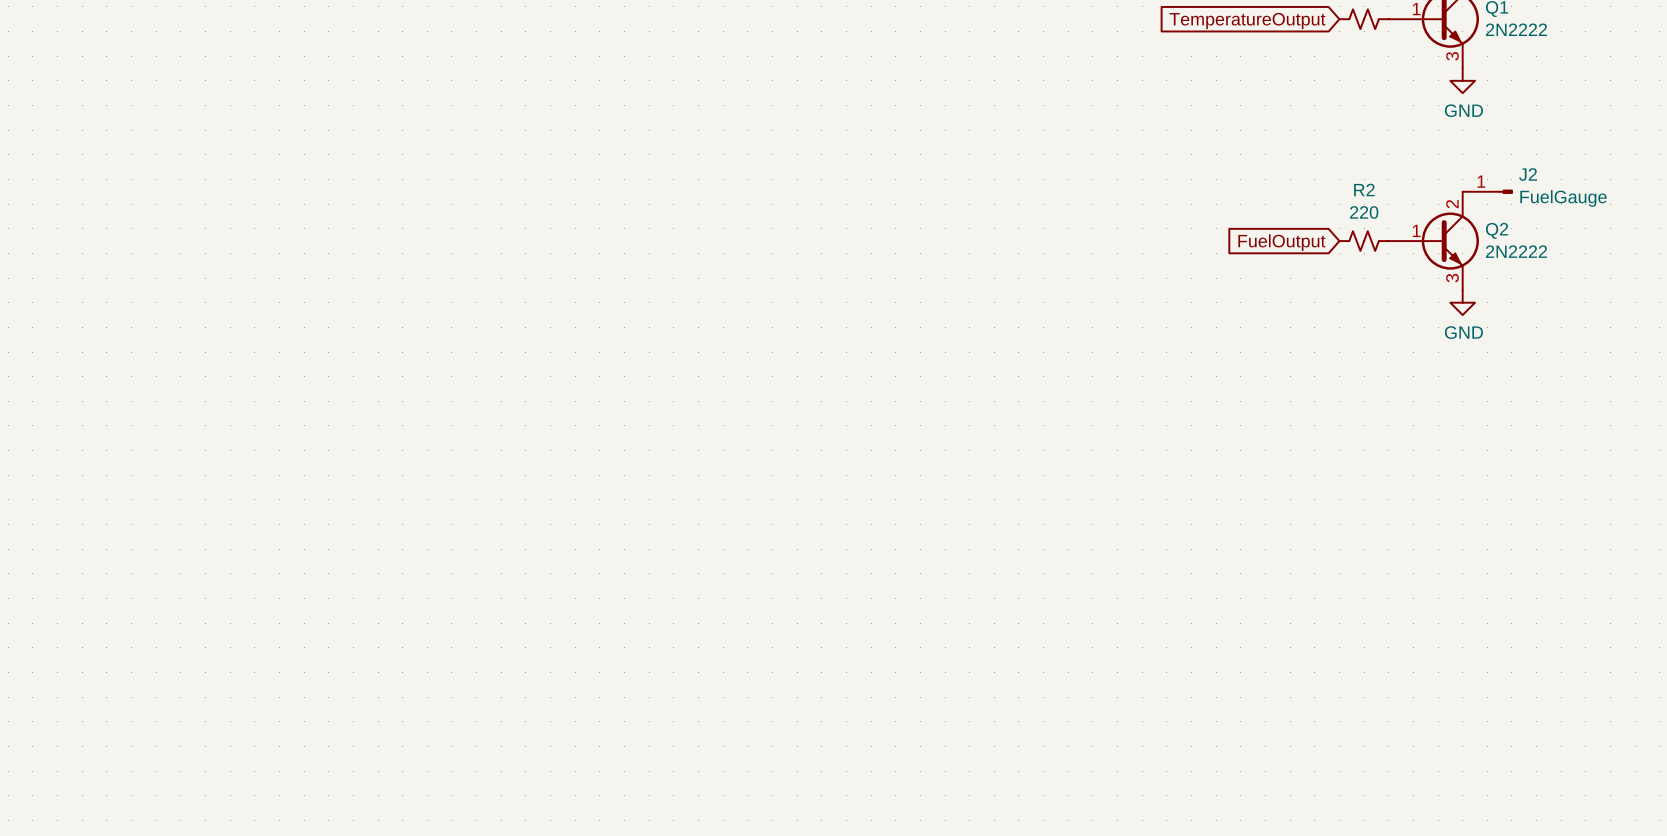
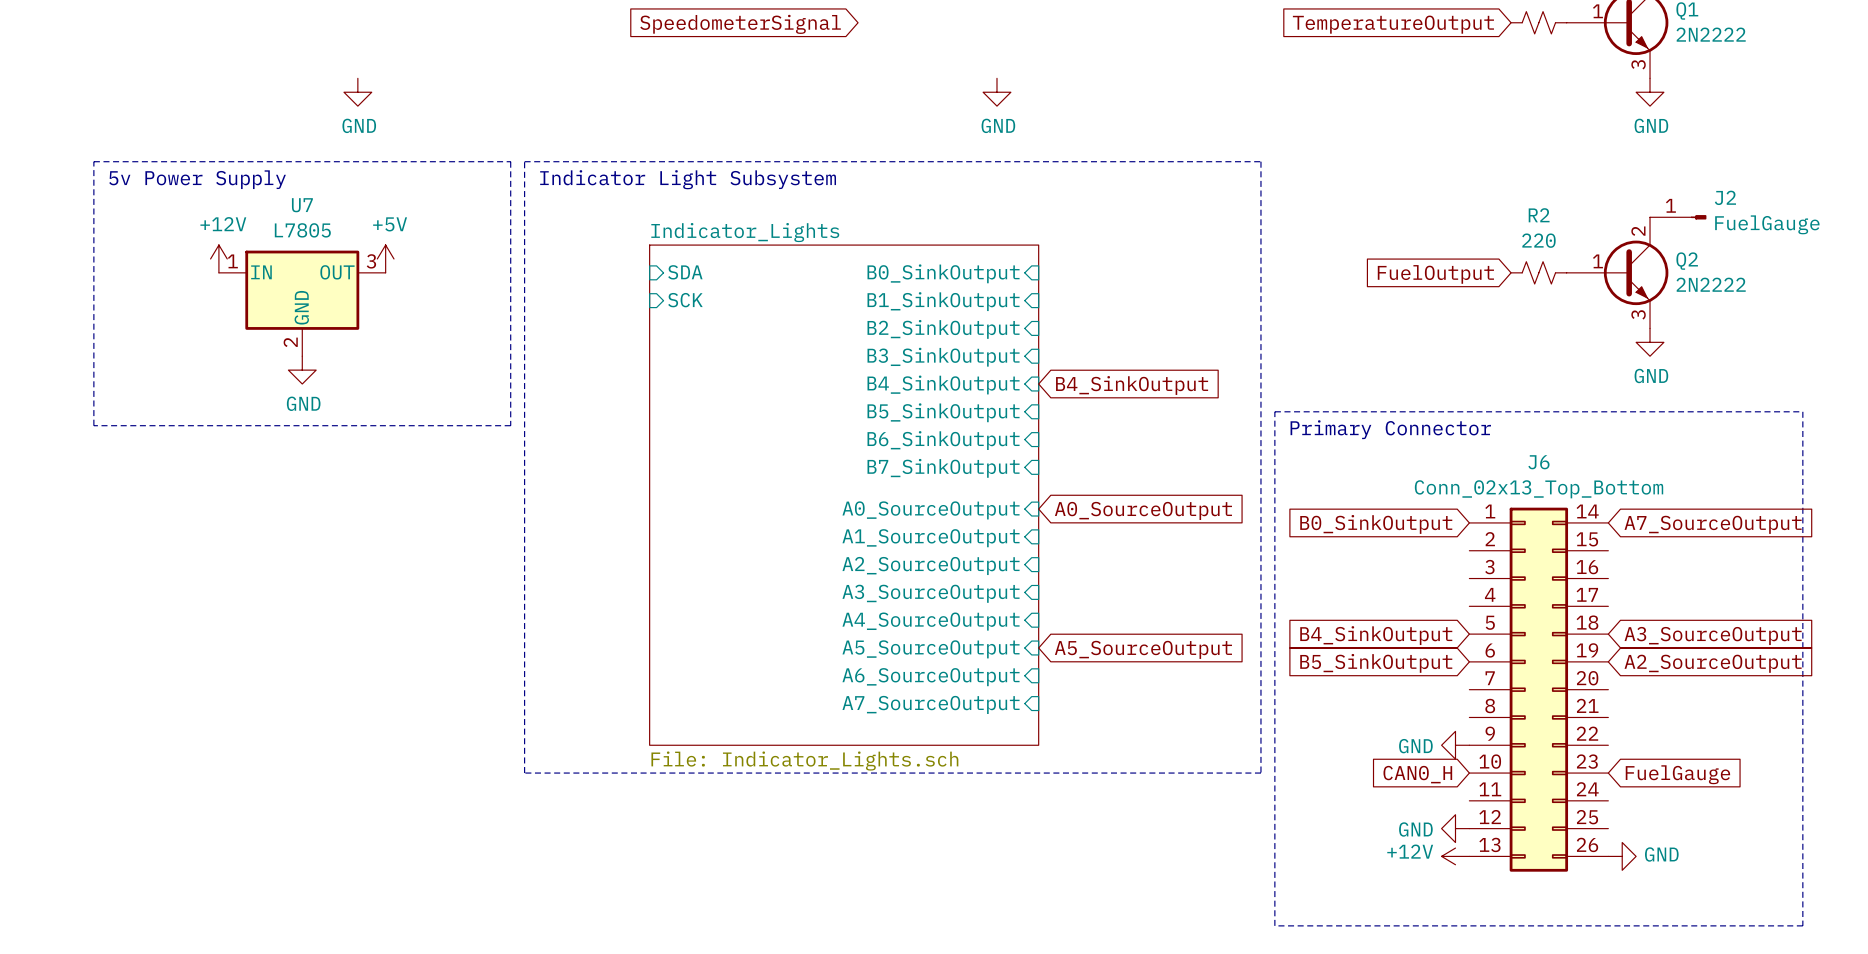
global label: none -> SpeedometerSignal (740, 24)
power symbol: none -> GND (357, 92)
power symbol: none -> GND (996, 92)
line: none -> (93, 161) (93, 425) (510, 425) (510, 161) (93, 161)
line: none -> (524, 161) (1260, 161) (1260, 773) (524, 773) (524, 161)
text: none -> 5v Power Supply (197, 179)
text: none -> Indicator Light Subsystem (688, 179)
power symbol: none -> +12V (218, 258)
power symbol: none -> +5V (385, 258)
sheet pin: none -> SDA (685, 272)
sheet pin: none -> B0_SinkOutput (943, 273)
sheet pin: none -> SCK (685, 300)
sheet pin: none -> B1_SinkOutput (943, 301)
U7: none -> L7805 (302, 303)
sheet pin: none -> B2_SinkOutput (943, 329)
sheet pin: none -> B3_SinkOutput (943, 357)
power symbol: none -> GND (302, 370)
sheet pin: none -> B4_SinkOutput (943, 384)
global label: none -> B4_SinkOutput (1132, 385)
line: none -> (1274, 411) (1274, 925) (1802, 925) (1802, 411) (1274, 411)
sheet pin: none -> B5_SinkOutput (943, 412)
text: none -> Primary Connector (1390, 429)
sheet pin: none -> B6_SinkOutput (943, 440)
sheet pin: none -> B7_SinkOutput (943, 468)
sheet Indicator_Lights: none -> File: Indicator_Lights.sch (844, 495)
sheet pin: none -> A0_SourceOutput (931, 510)
global label: none -> A0_SourceOutput (1143, 510)
global label: none -> B0_SinkOutput (1376, 524)
global label: none -> A7_SourceOutput (1713, 524)
sheet pin: none -> A1_SourceOutput (931, 538)
sheet pin: none -> A2_SourceOutput (931, 565)
sheet pin: none -> A3_SourceOutput (931, 593)
sheet pin: none -> A4_SourceOutput (931, 621)
global label: none -> B4_SinkOutput (1376, 635)
global label: none -> A3_SourceOutput (1713, 635)
sheet pin: none -> A5_SourceOutput (931, 649)
global label: none -> A5_SourceOutput (1143, 649)
global label: none -> B5_SinkOutput (1376, 663)
global label: none -> A2_SourceOutput (1713, 663)
sheet pin: none -> A6_SourceOutput (931, 677)
J6: none -> Conn_02x13_Top_Bottom (1538, 689)
sheet pin: none -> A7_SourceOutput (931, 704)
power symbol: none -> GND (1455, 745)
global label: none -> CAN0_H (1417, 774)
global label: none -> FuelGauge (1677, 774)
power symbol: none -> GND (1455, 828)
power symbol: none -> +12V (1455, 856)
power symbol: none -> GND (1622, 856)

